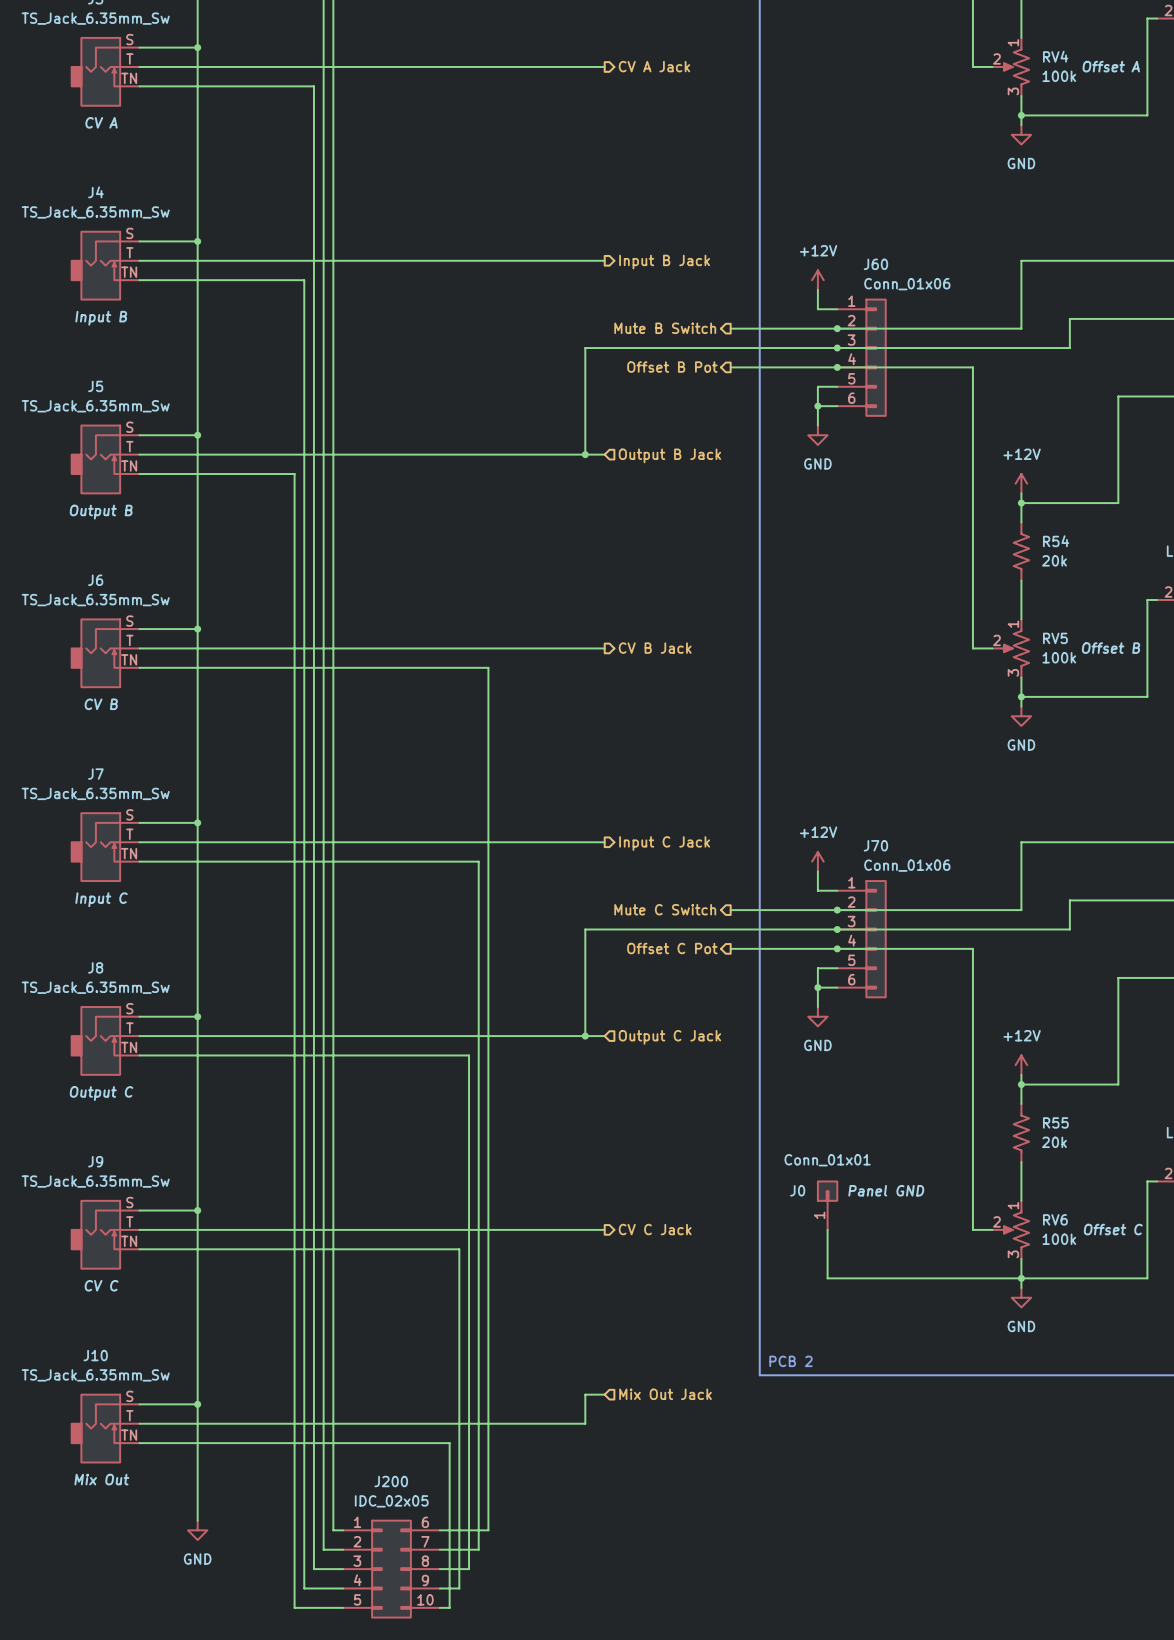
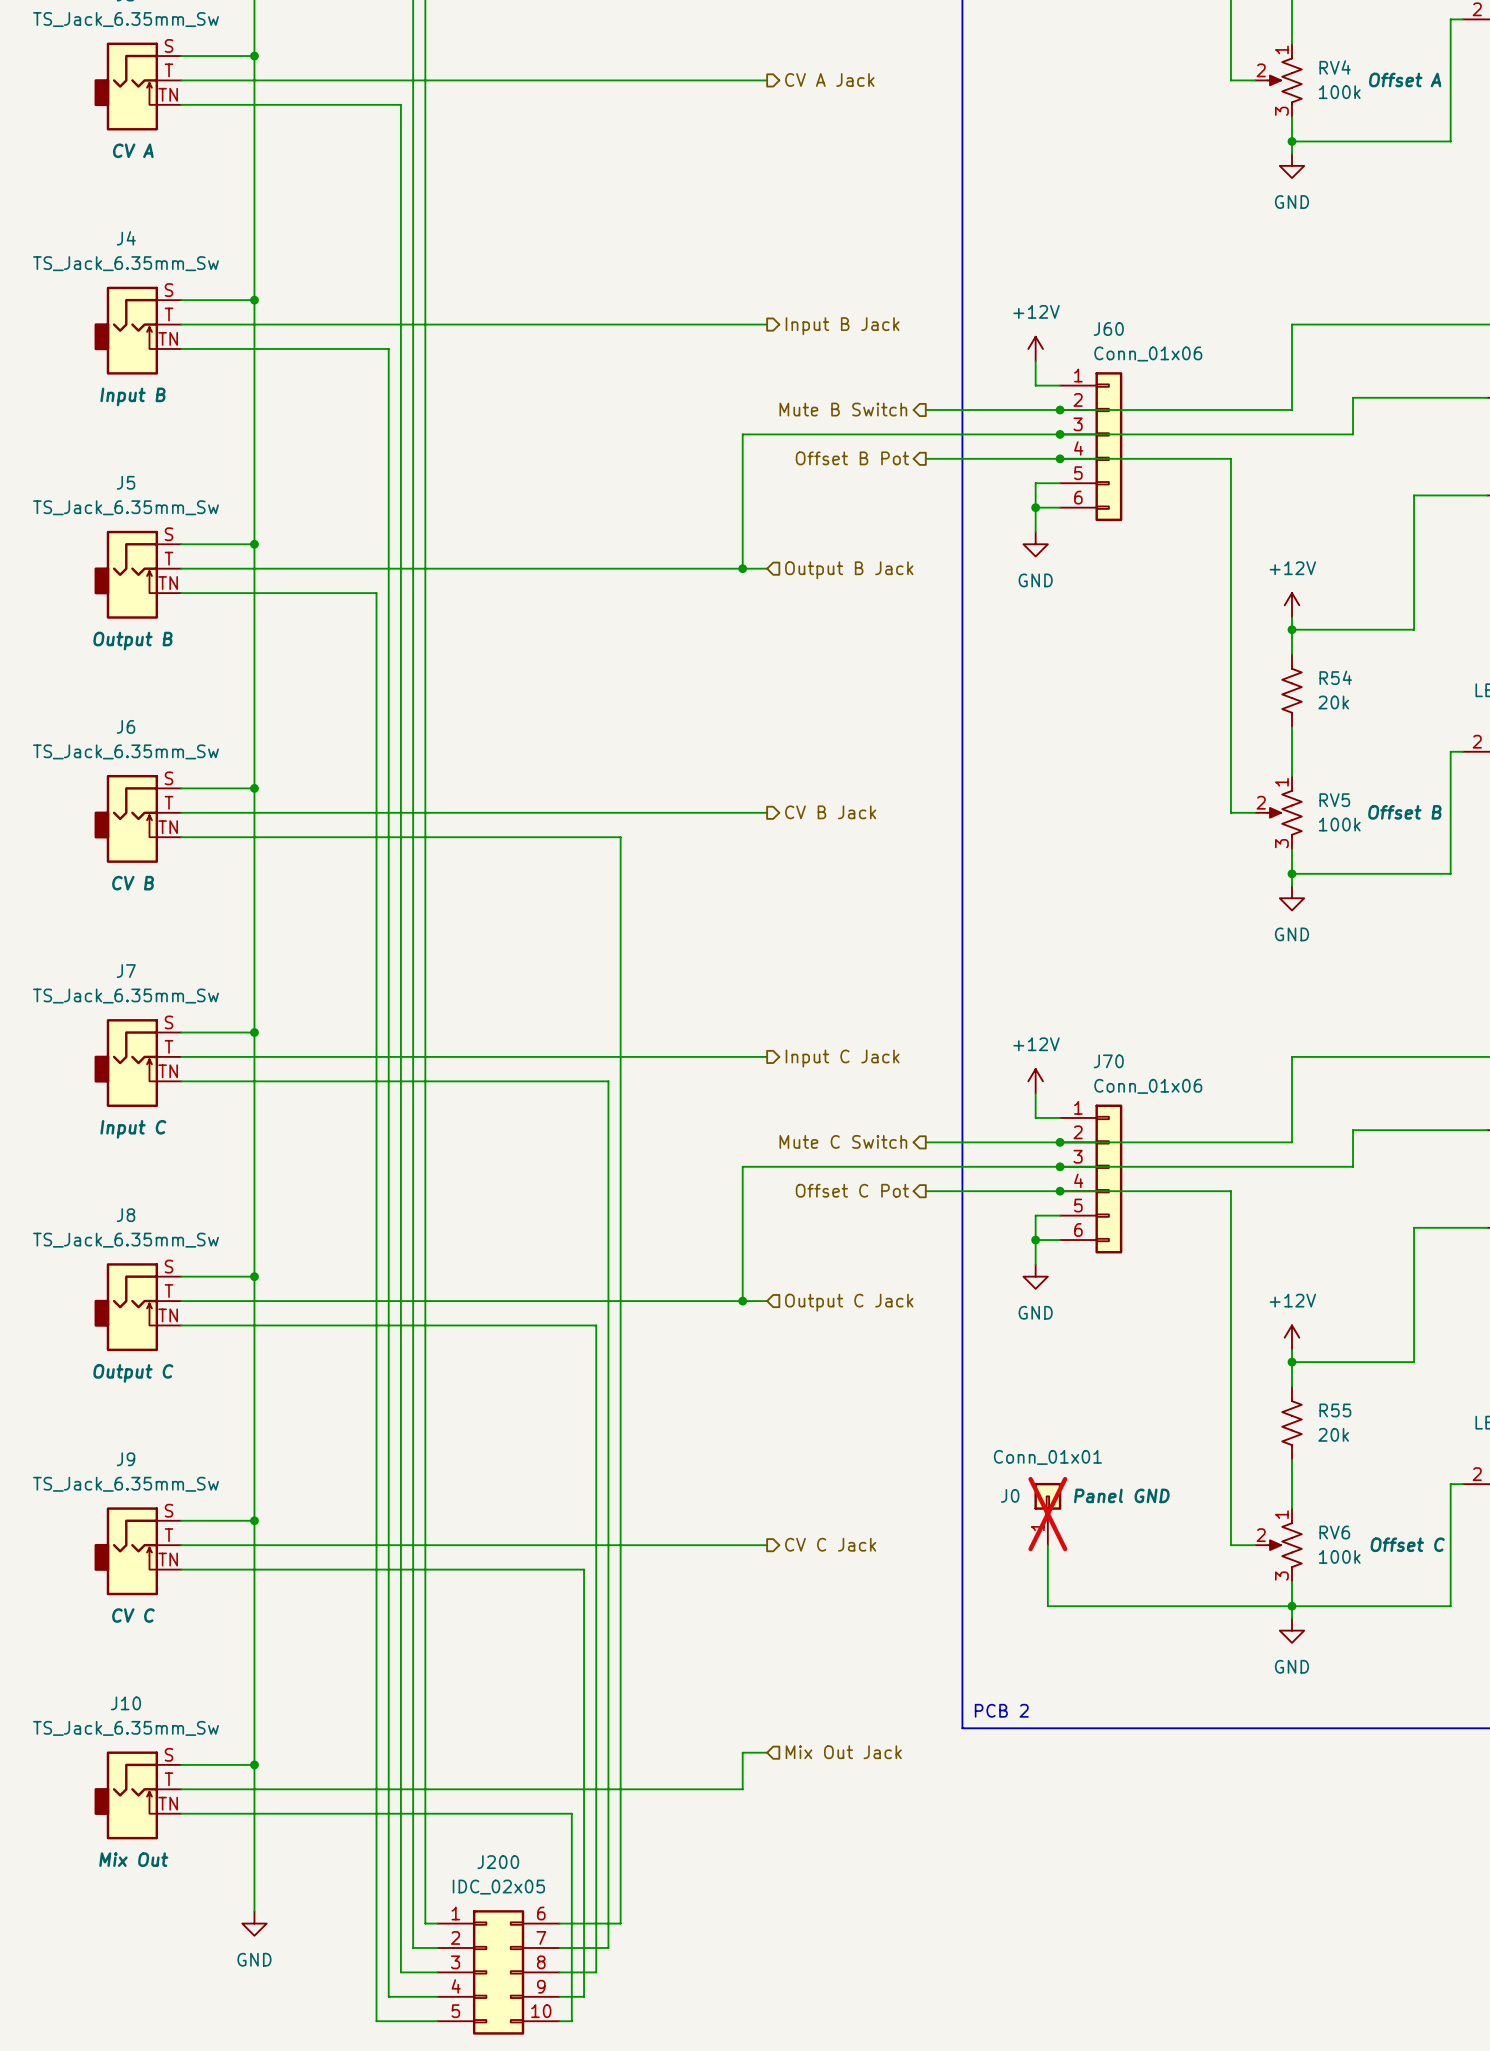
J0 do-not-place cross: none -> (1047, 1514)

